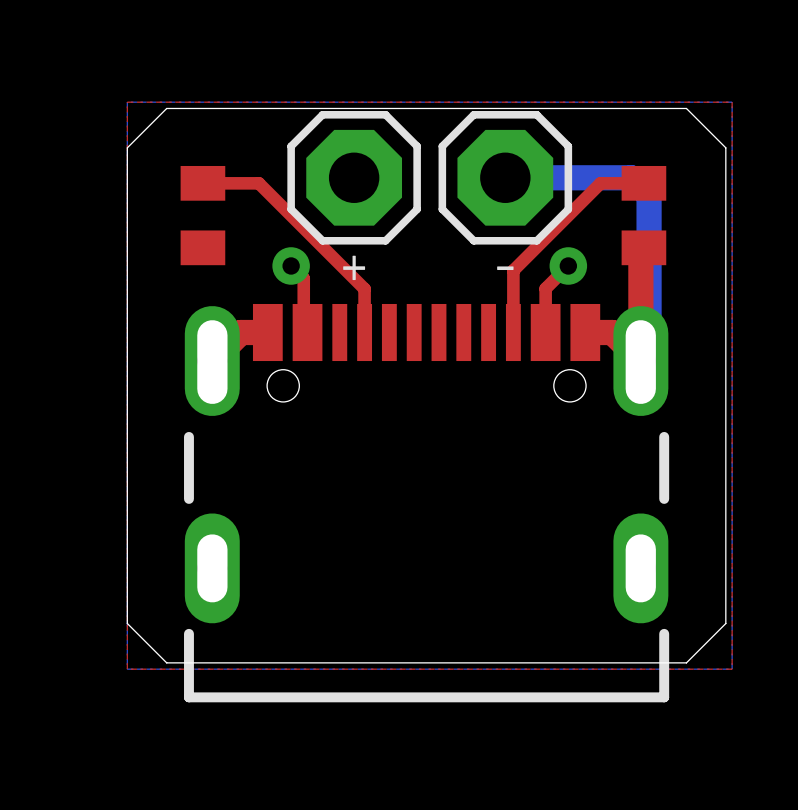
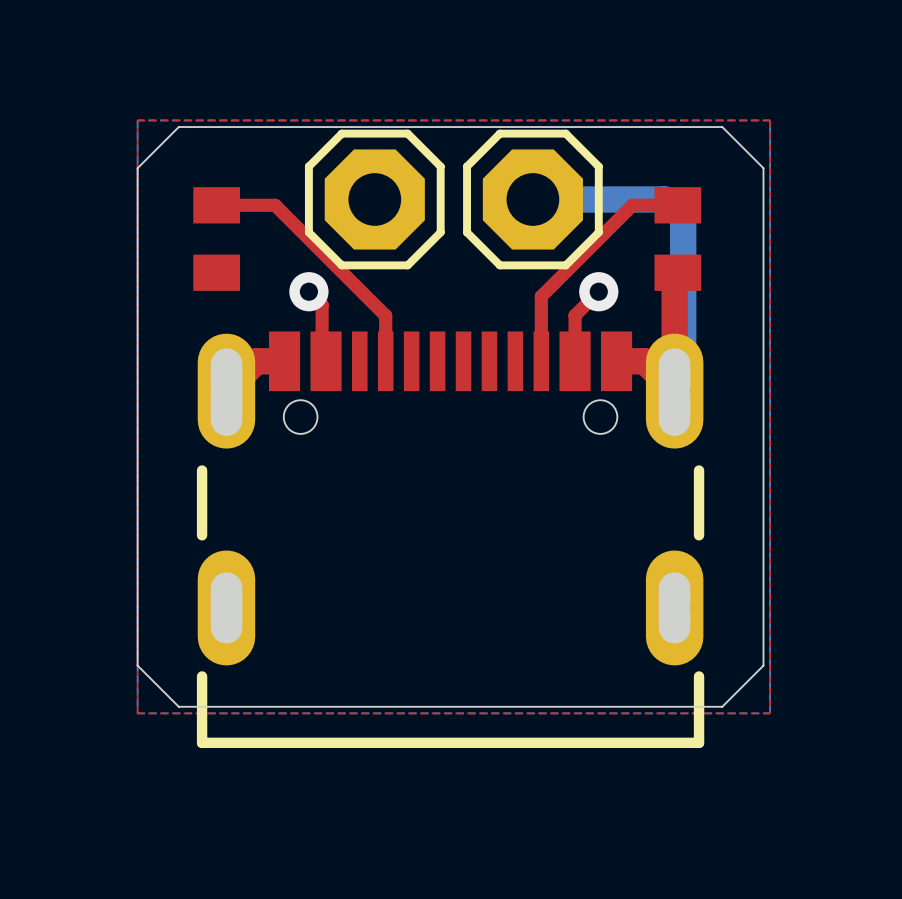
text: + (354, 267) -> none
text: - (505, 268) -> none

